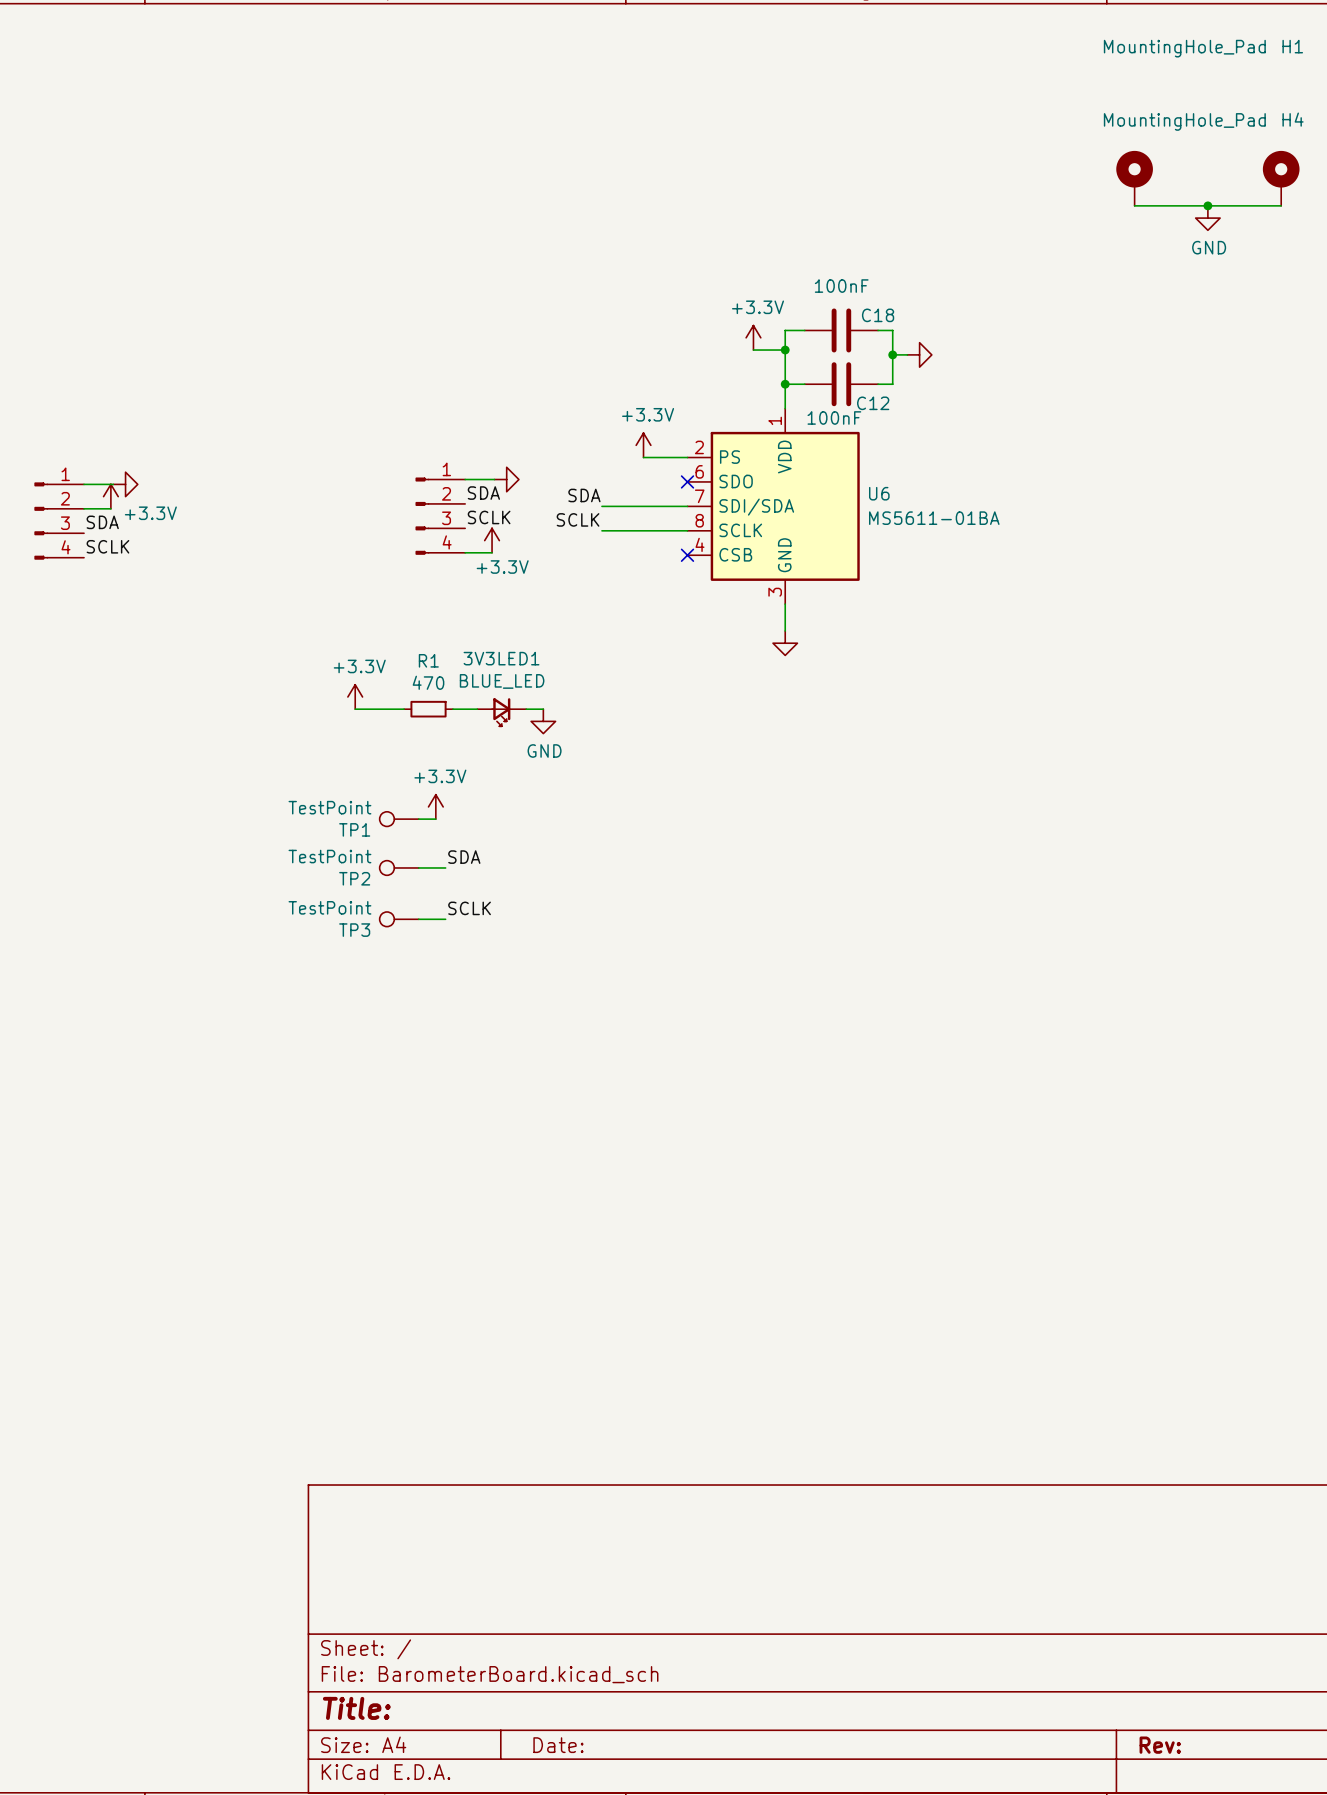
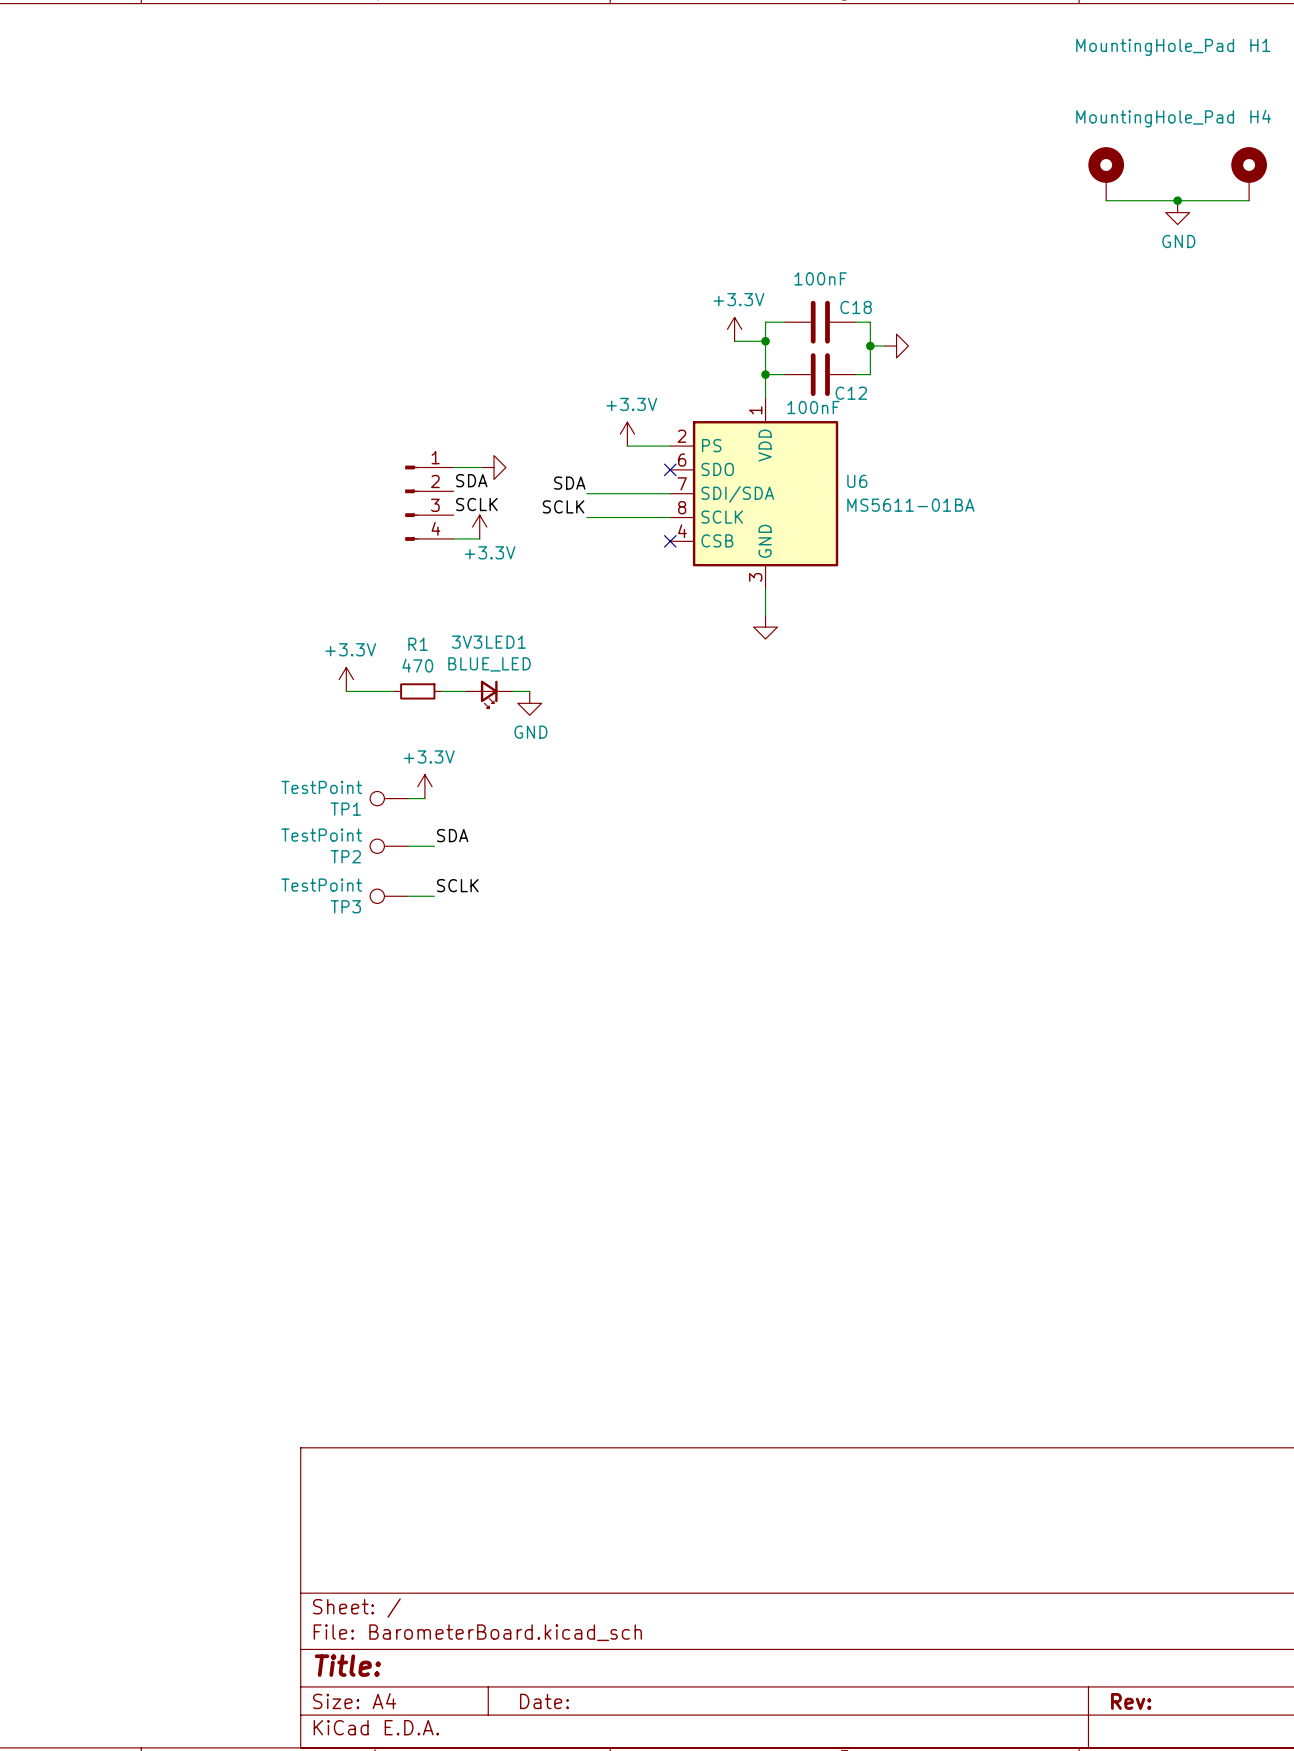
wire: (84, 484) (113, 484) -> none
power symbol: (125, 484) -> none
power symbol: +3.3V (110, 496) -> none
wire: (84, 508) (110, 508) -> none
part: (59, 521) -> none
label: SDA (102, 522) -> none
label: SCLK (107, 546) -> none

